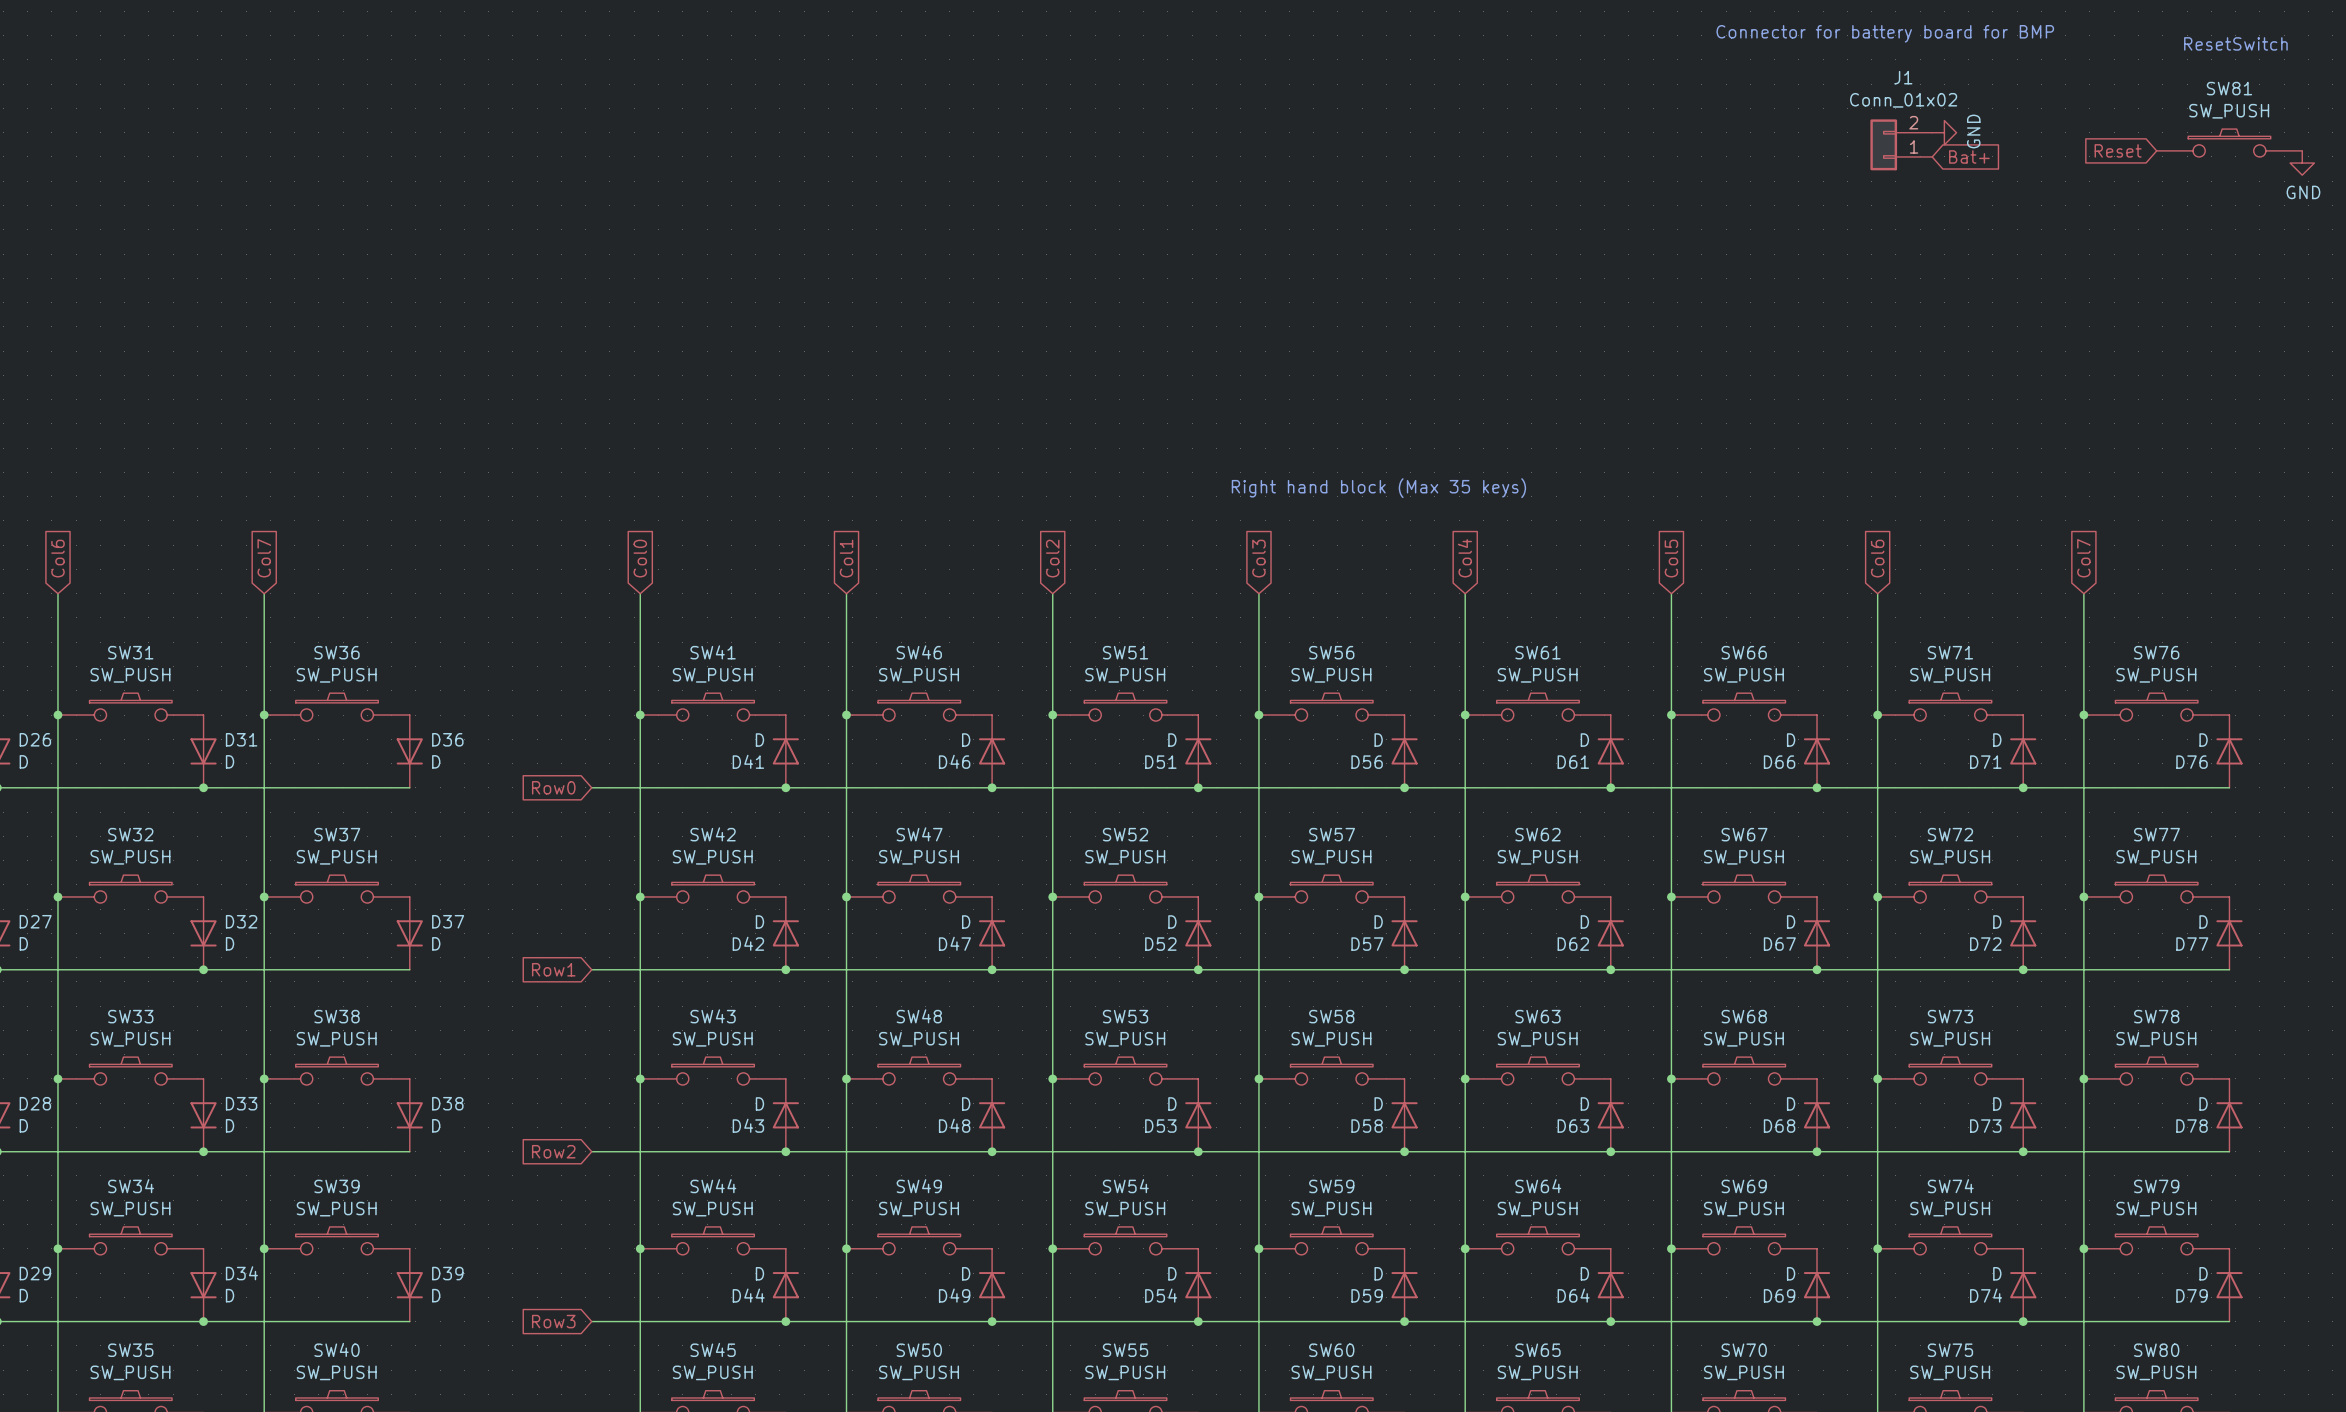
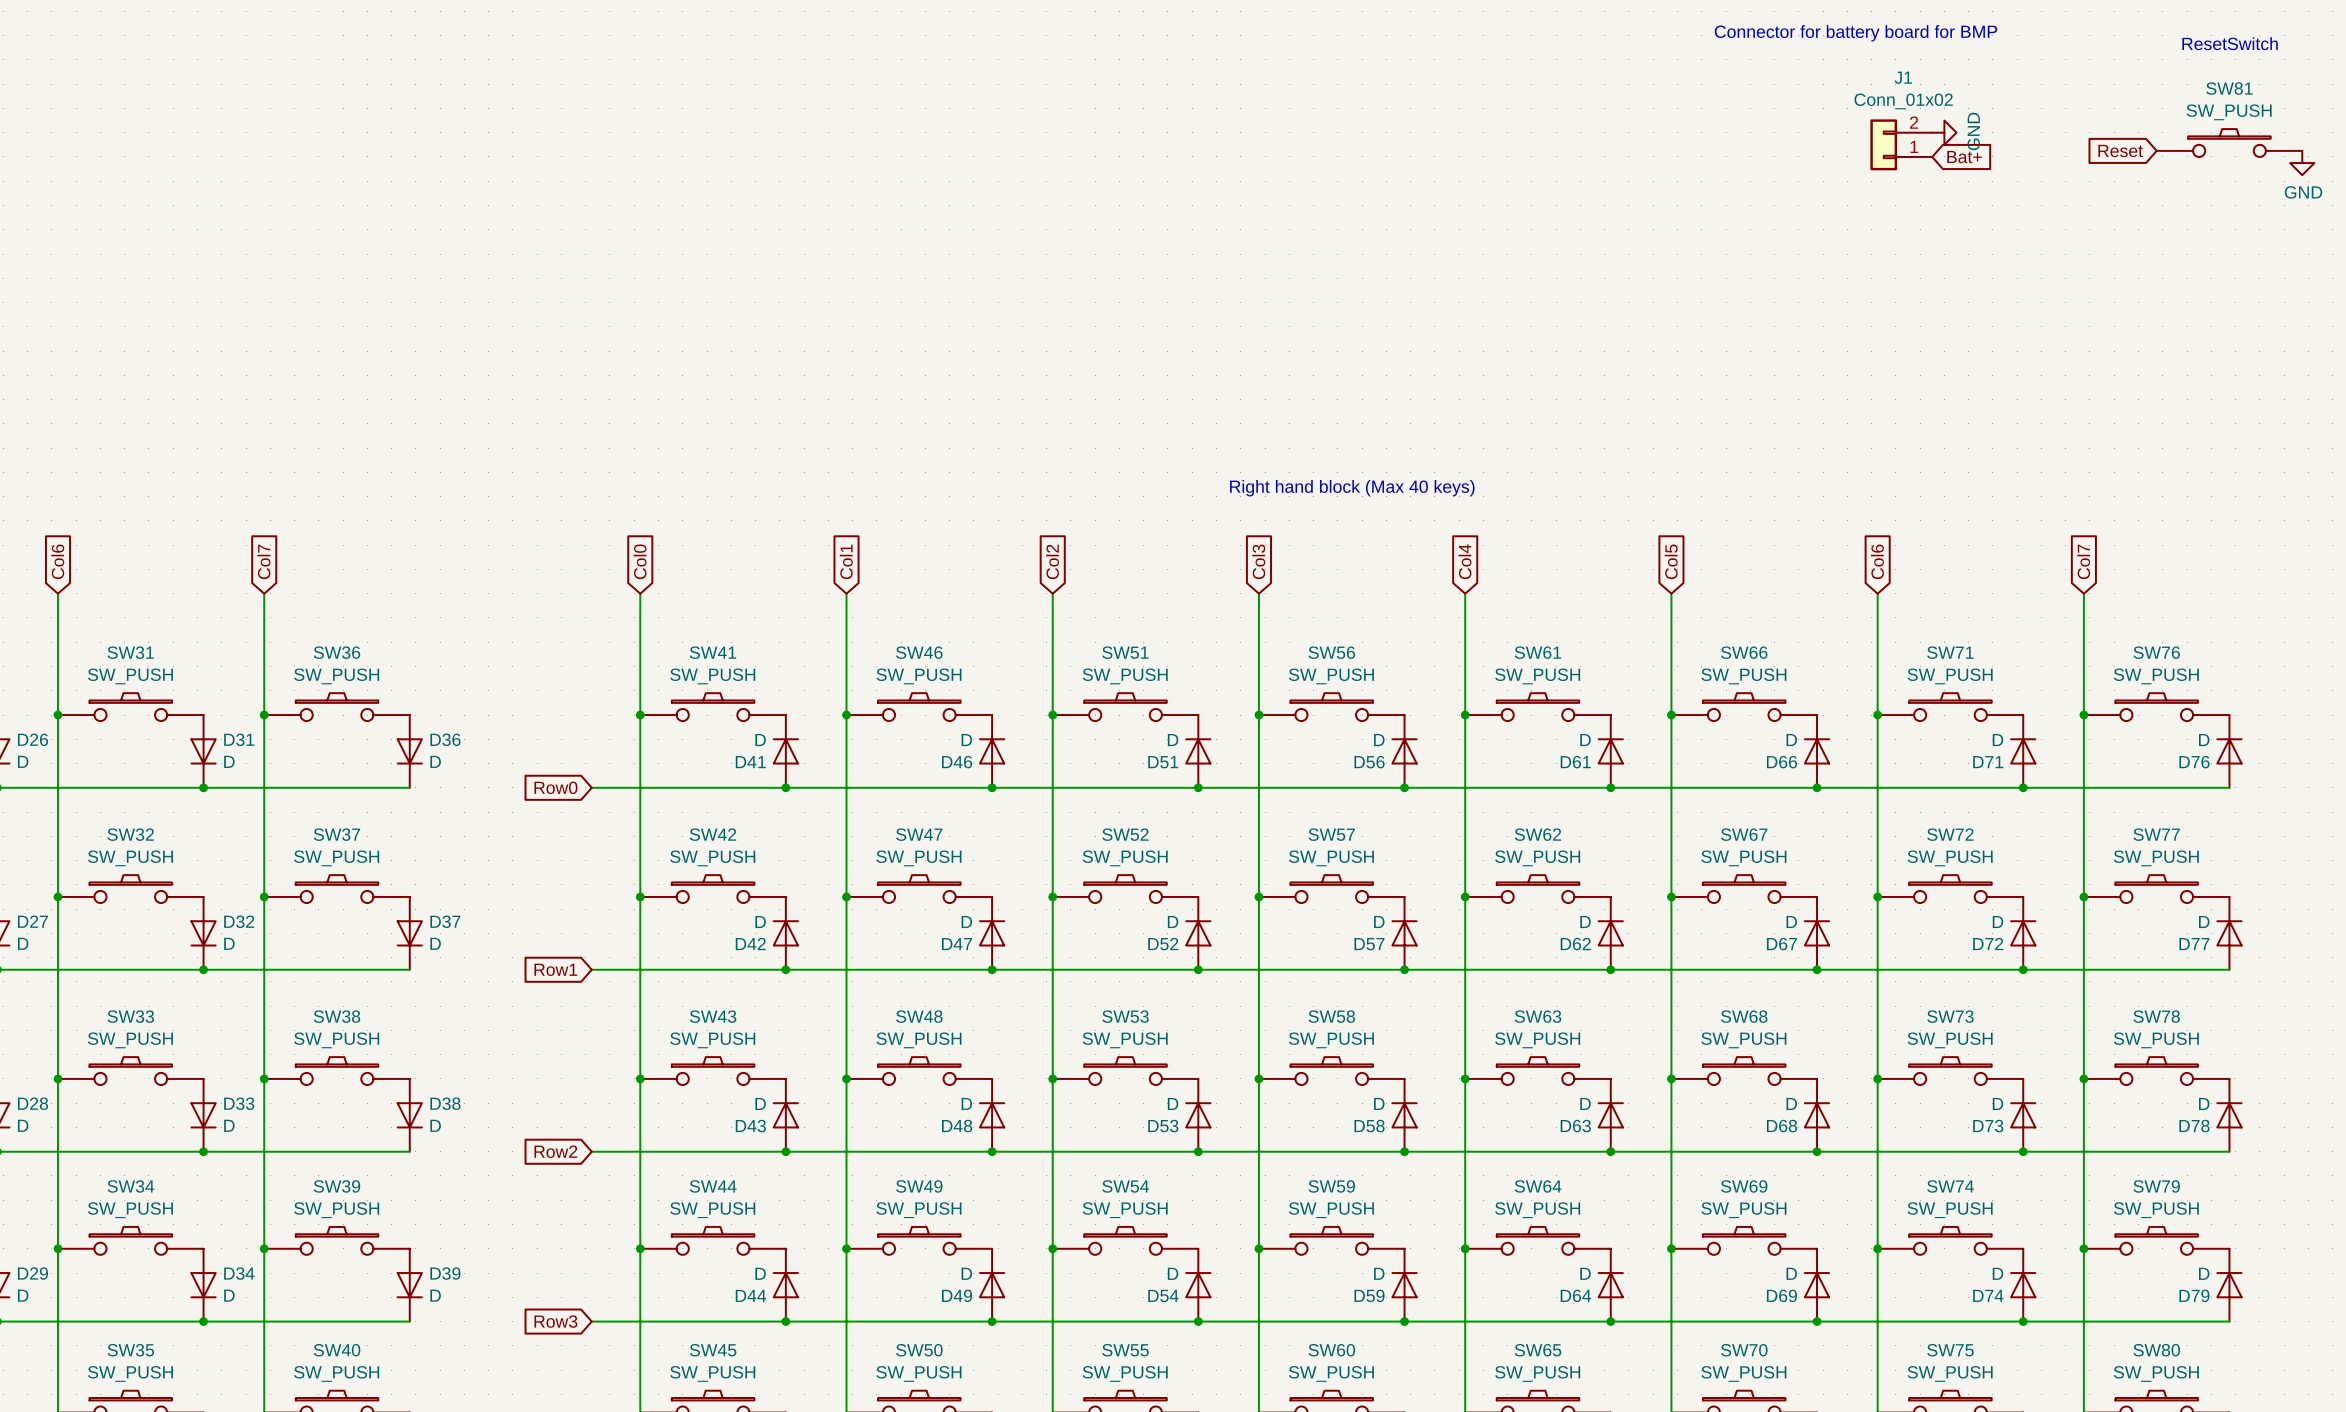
text: Right hand block (Max 35 keys) (1378, 488) -> Right hand block (Max 40 keys) (1352, 488)

